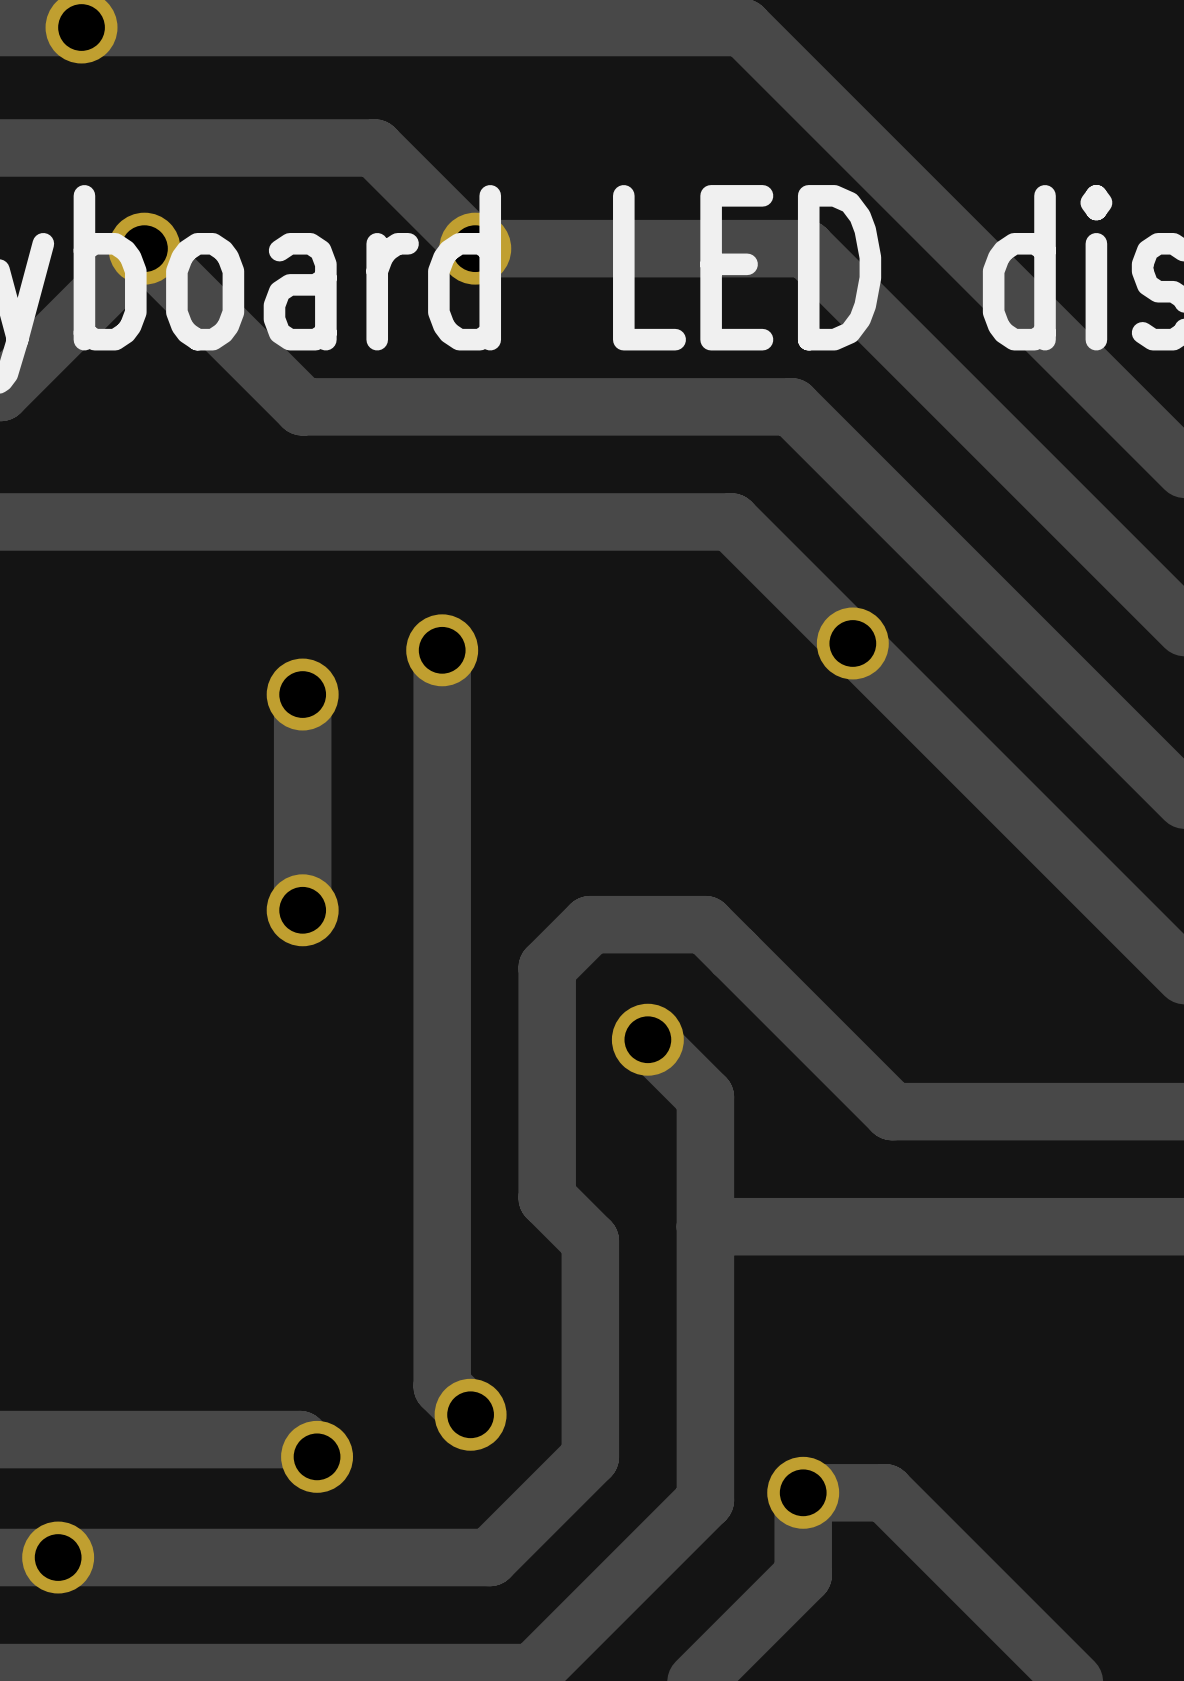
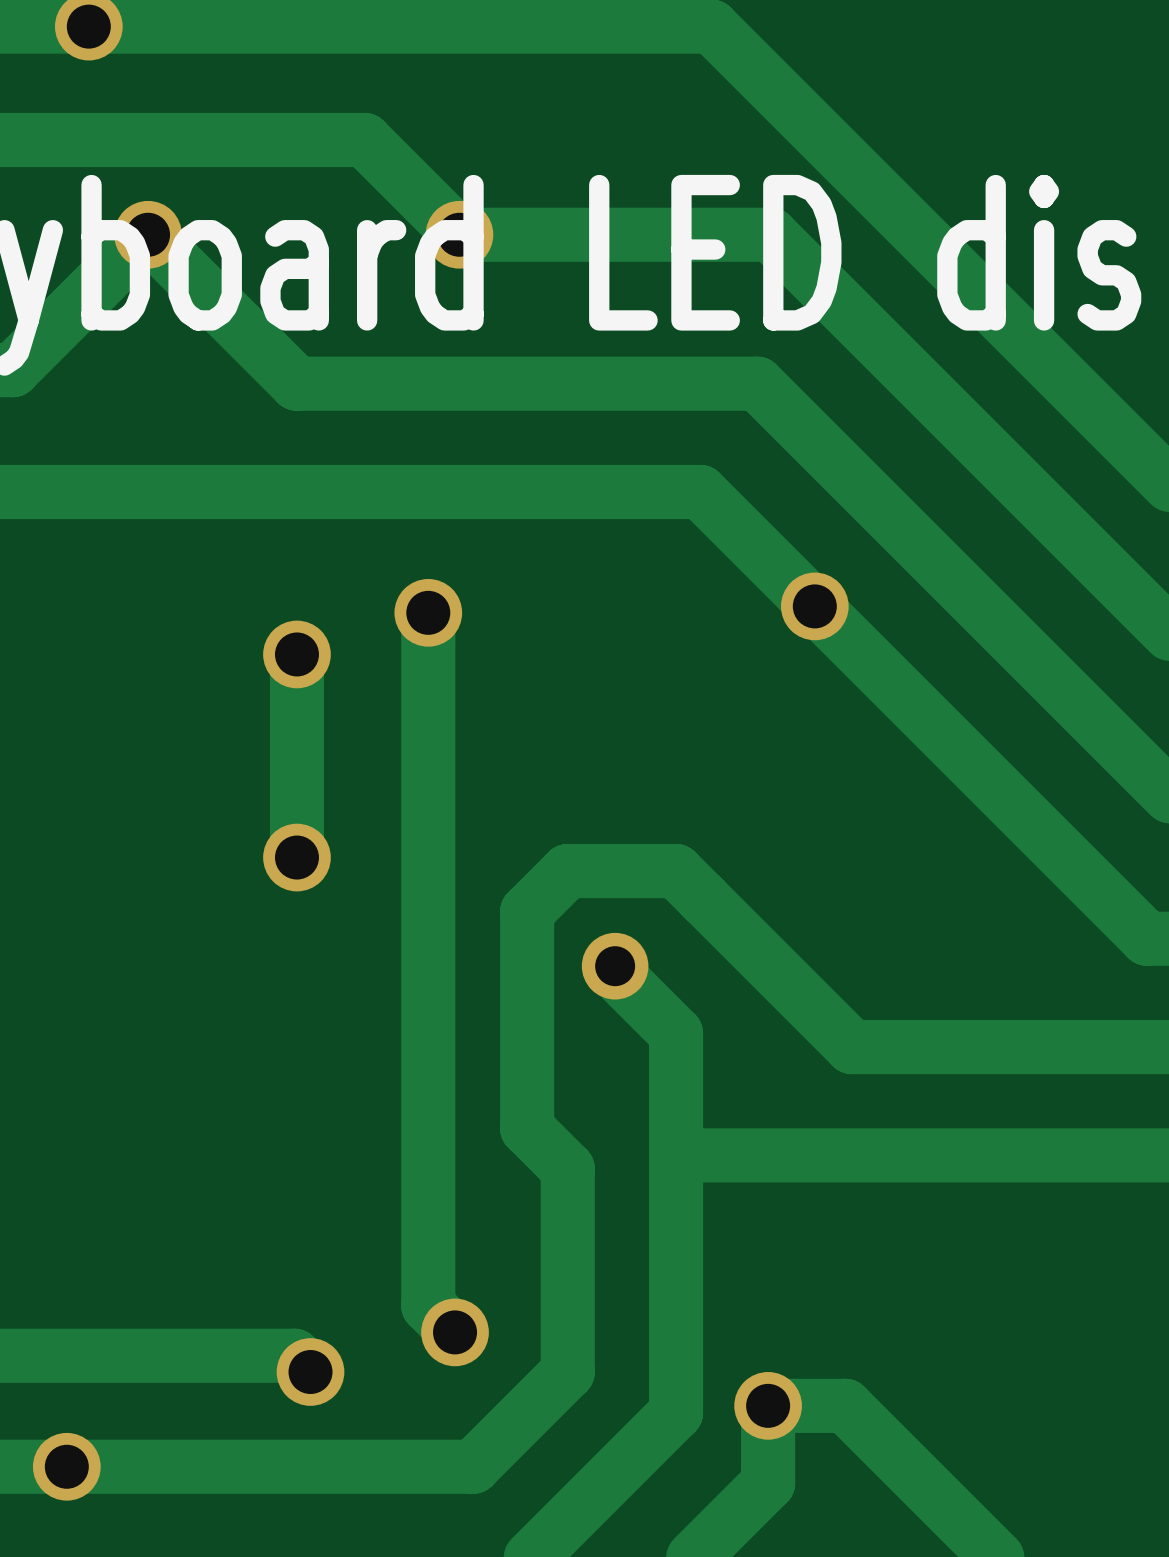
via position: (647, 1039) -> (615, 966)

